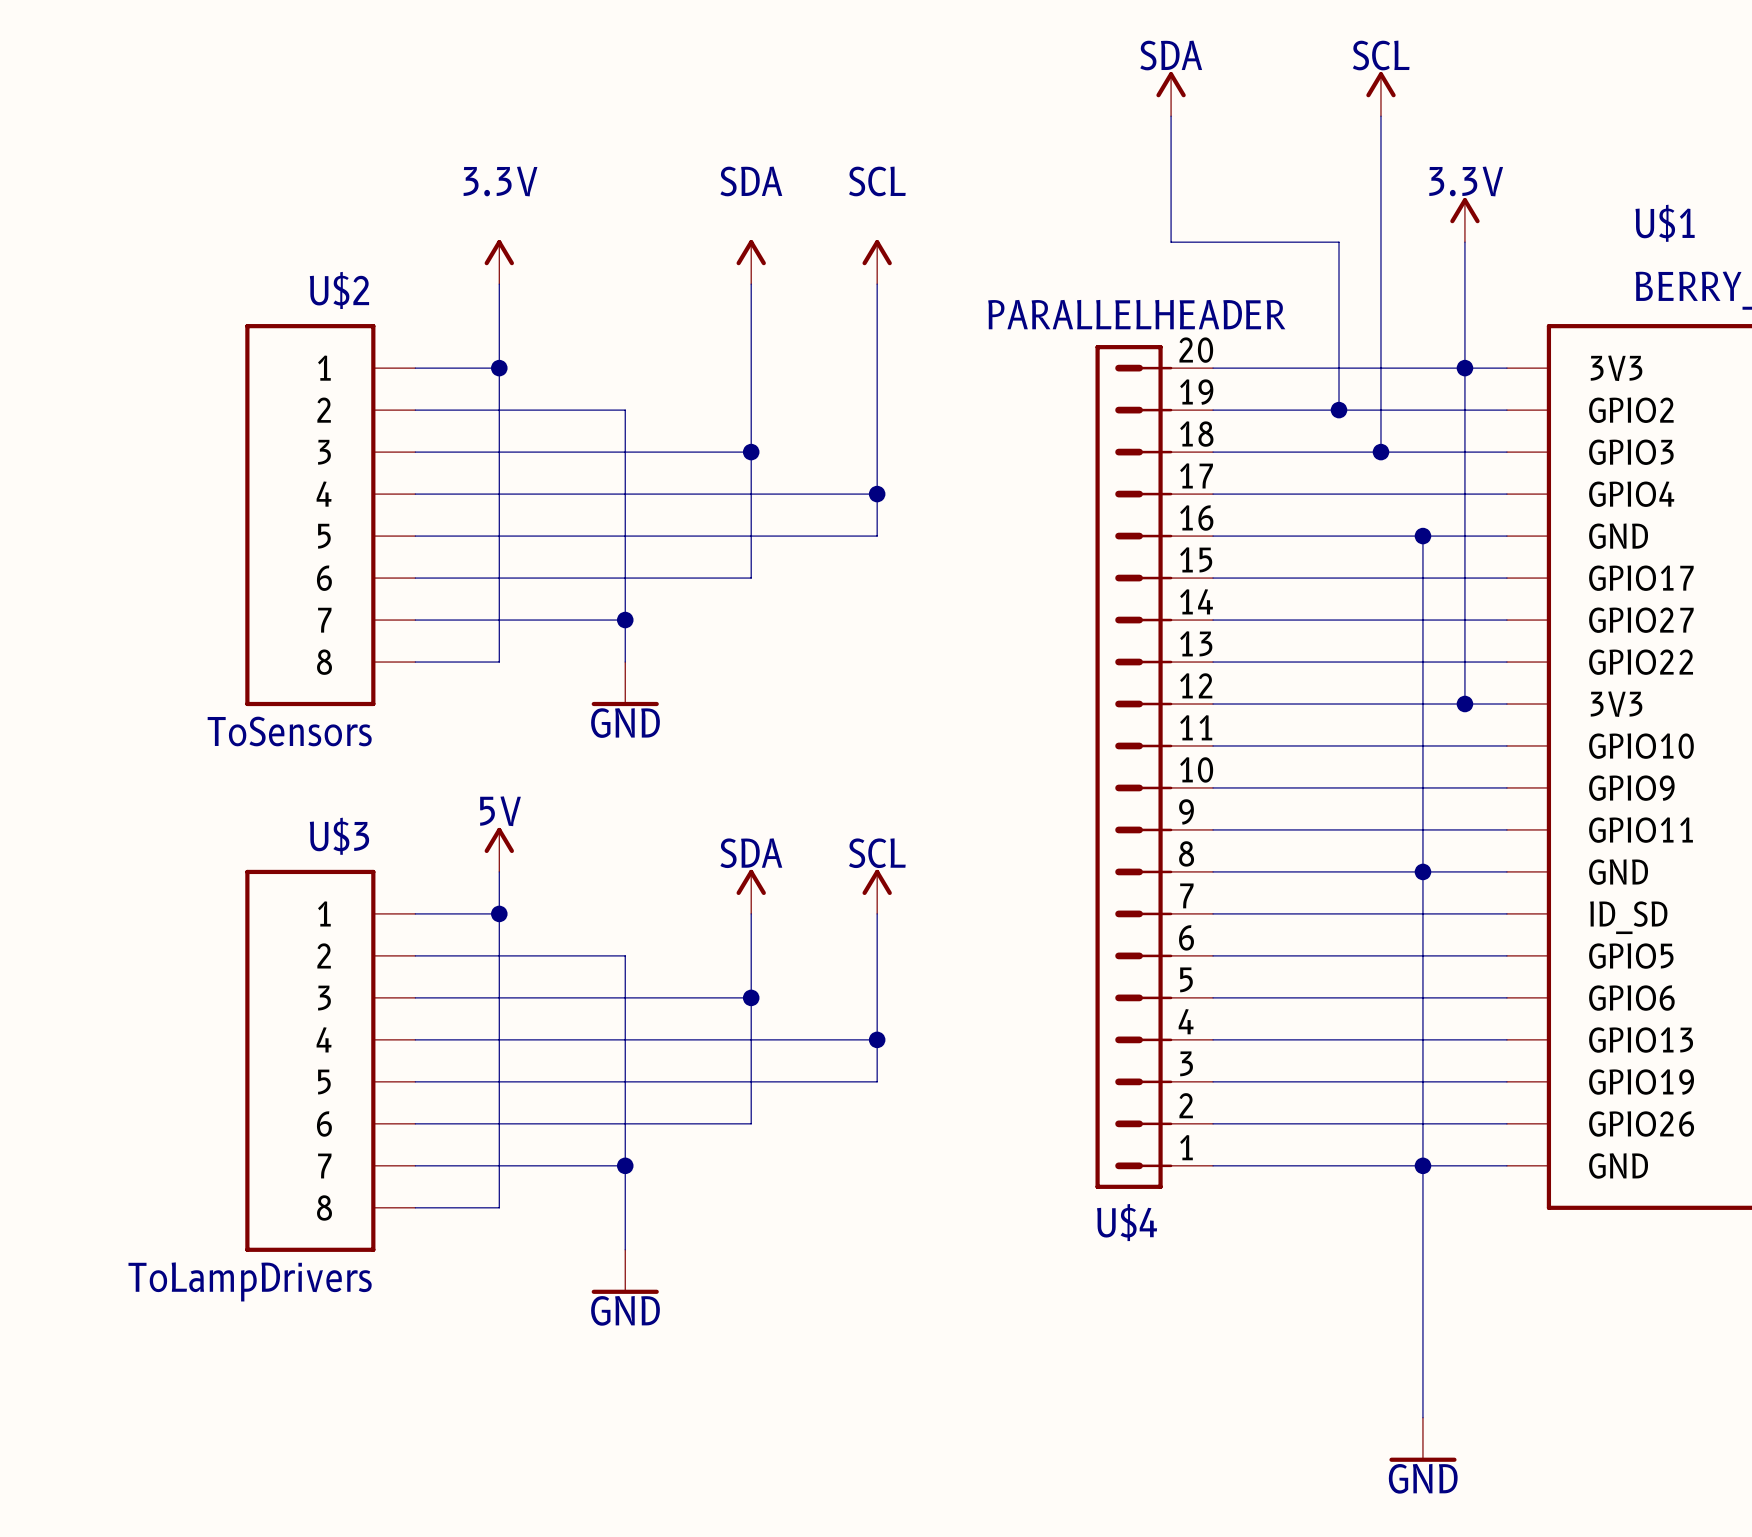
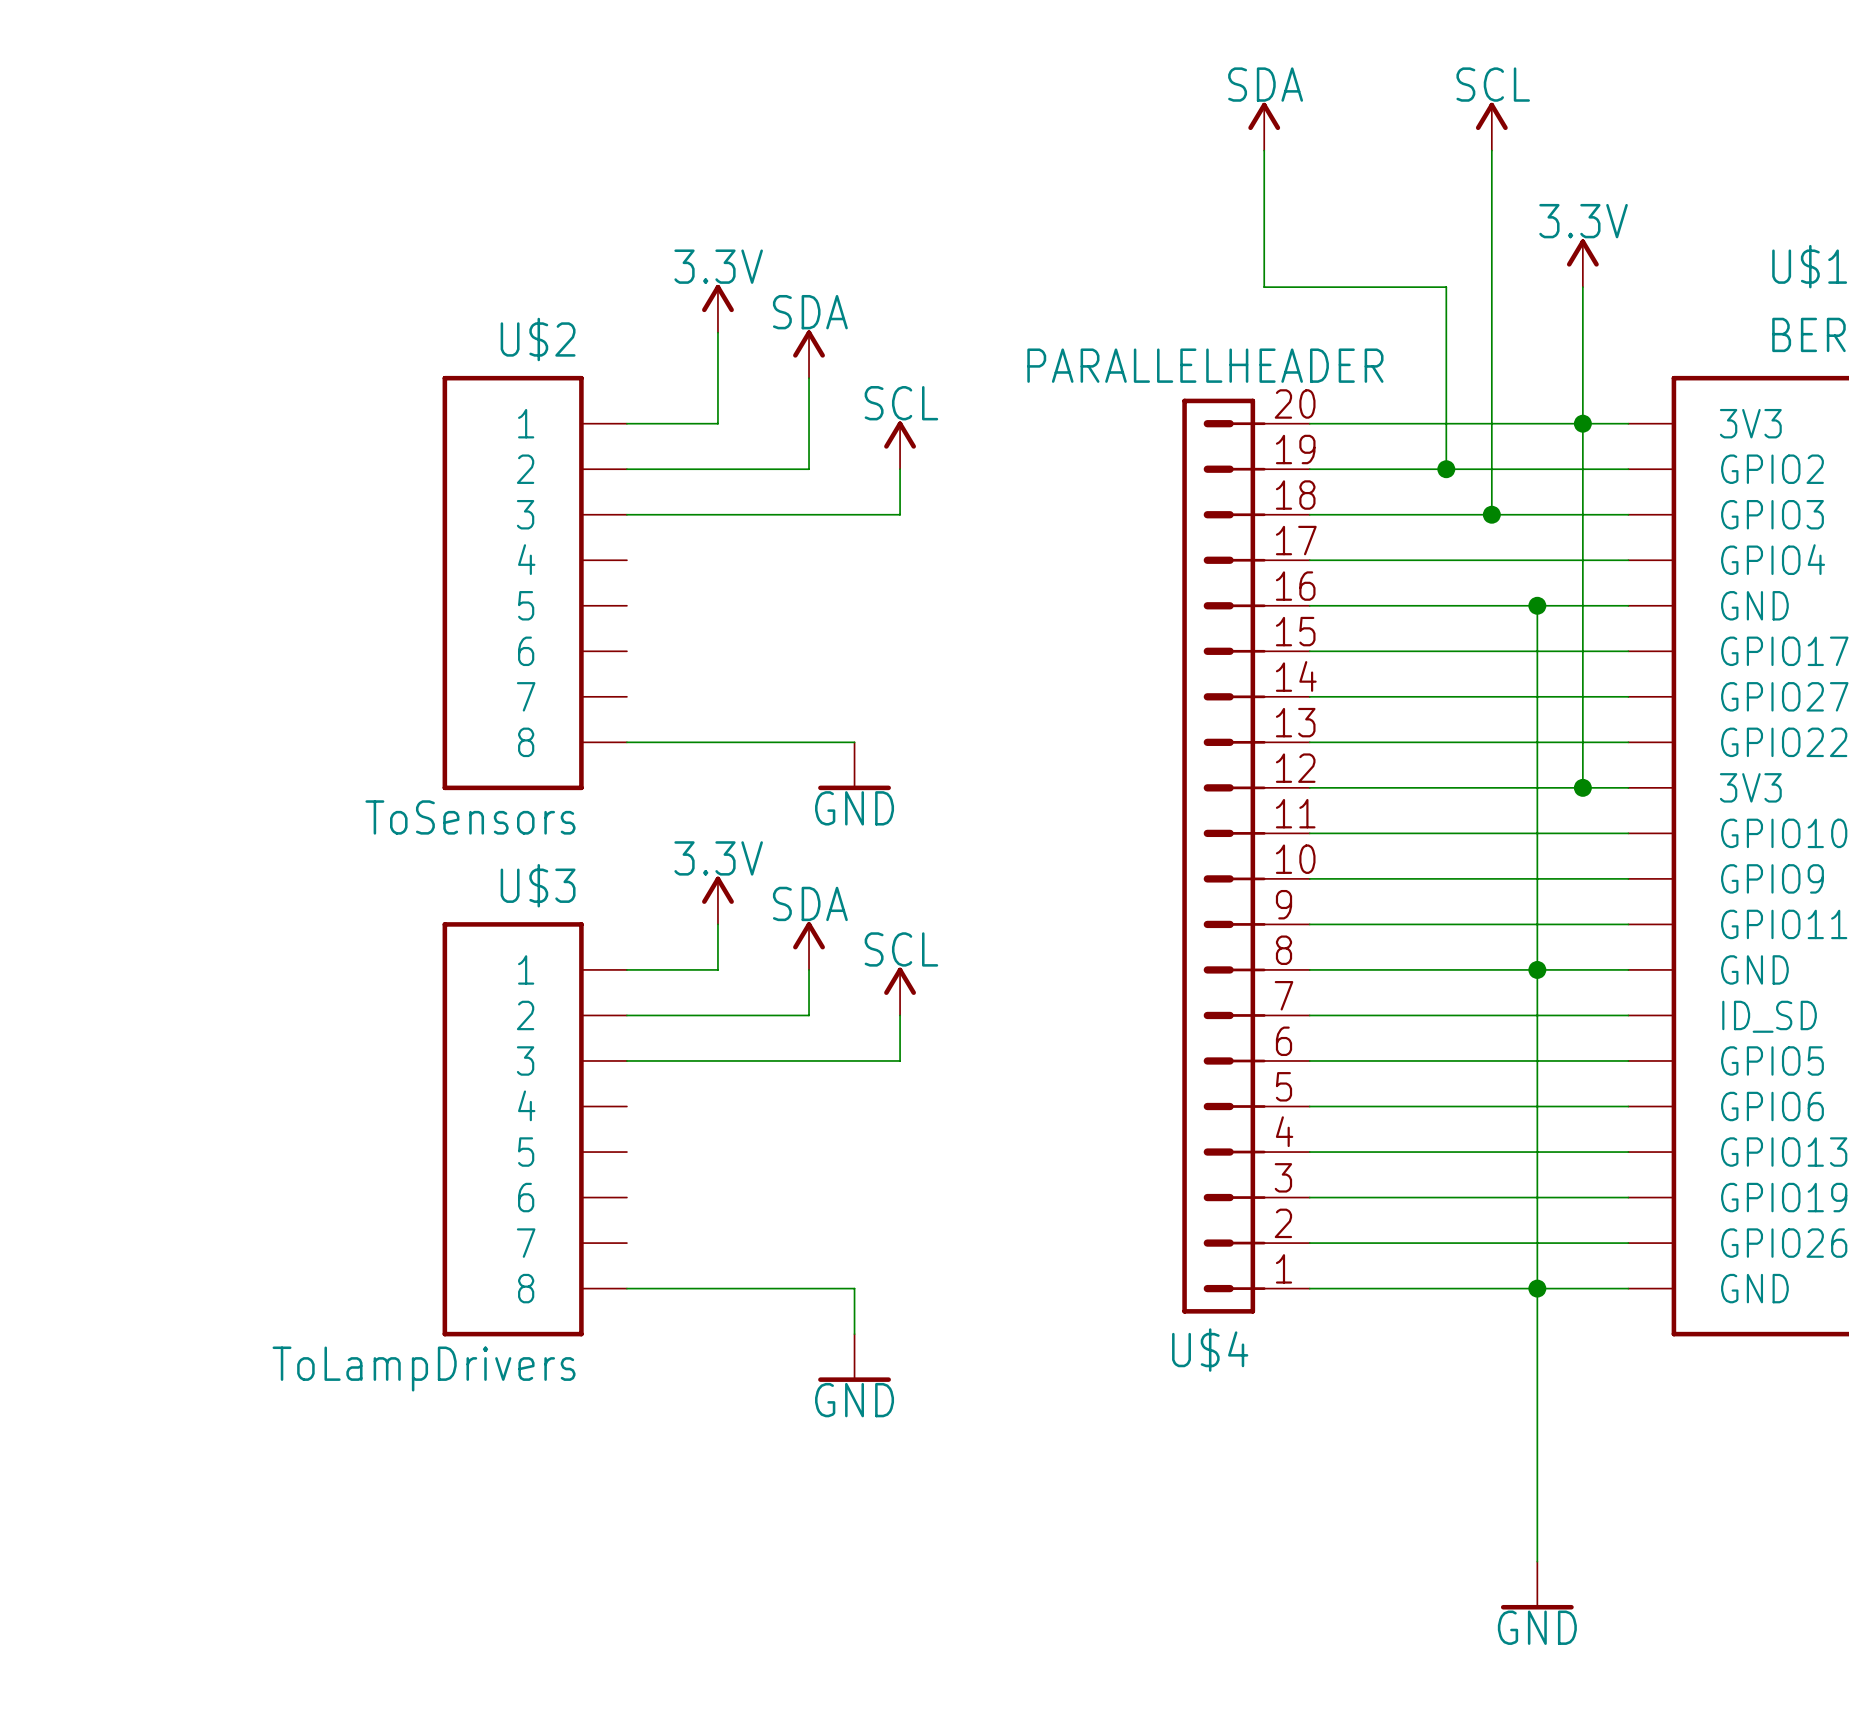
power symbol text position: 3.3V (500, 181) -> 3.3V (718, 266)
power symbol text position: SDA (751, 181) -> SDA (810, 312)
power symbol text position: SCL (877, 181) -> SCL (901, 403)
power symbol position: 3.3V (499, 262) -> 3.3V (717, 308)
power symbol position: SDA (751, 262) -> SDA (809, 354)
power symbol position: SCL (877, 262) -> SCL (900, 445)
wire: (499, 284) (499, 662) (415, 662) -> none
wire: none -> (717, 332) (717, 423) (626, 423)
wire: (877, 284) (877, 536) (415, 536) -> none
wire: (415, 368) (499, 368) -> none
junction: (499, 368) -> none
wire: (415, 410) (583, 410) -> none
wire: (625, 410) (625, 662) -> none
wire: (751, 410) (751, 578) (415, 578) -> (809, 469) (672, 469)
wire: none -> (900, 469) (900, 514) (809, 514)
wire: (415, 452) (583, 452) -> none
junction: (751, 452) -> none
wire: (415, 494) (877, 494) -> none
junction: (877, 494) -> none
U$2 position: (330, 515) -> (534, 583)
wire: (415, 620) (625, 620) -> (626, 742) (854, 742)
junction: (625, 620) -> none
power symbol position: GND (625, 684) -> GND (854, 766)
power symbol: none -> 3.3V (717, 900)
wire: none -> (717, 924) (717, 969) (626, 969)
power symbol: 5V (499, 849) -> none
wire: (499, 871) (499, 1207) (415, 1207) -> none
wire: none -> (809, 969) (809, 1015) (626, 1015)
power symbol position: SDA (751, 891) -> SDA (809, 946)
power symbol position: SCL (877, 891) -> SCL (900, 991)
wire: (415, 913) (499, 913) -> none
junction: (499, 913) -> none
wire: (751, 913) (751, 1123) (415, 1123) -> none
wire: (877, 913) (877, 1081) (415, 1081) -> none
wire: (415, 955) (583, 955) -> none
wire: (625, 955) (625, 1249) -> (672, 1060) (900, 1060) (900, 1015)
wire: (415, 997) (751, 997) -> none
junction: (751, 997) -> none
wire: (415, 1039) (877, 1039) -> none
junction: (877, 1039) -> none
U$3 position: (330, 1060) -> (534, 1129)
wire: (415, 1165) (583, 1165) -> none
wire: none -> (672, 1288) (854, 1288) (854, 1334)
junction: (625, 1165) -> none
power symbol position: GND (625, 1271) -> GND (854, 1358)

